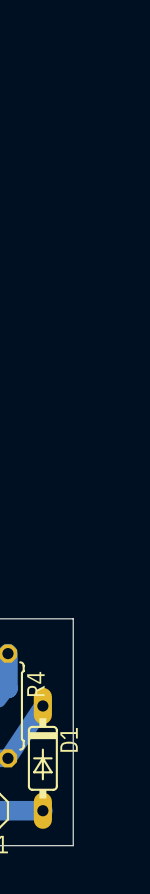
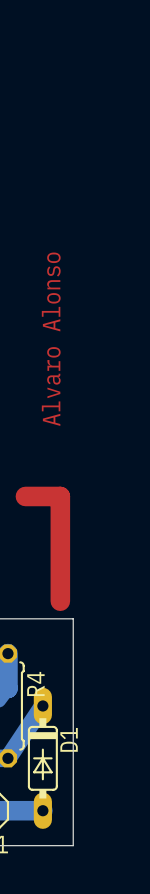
text: none -> Alvaro Alonso (51, 339)
top track: none -> (25, 496) (60, 496) (60, 601)

